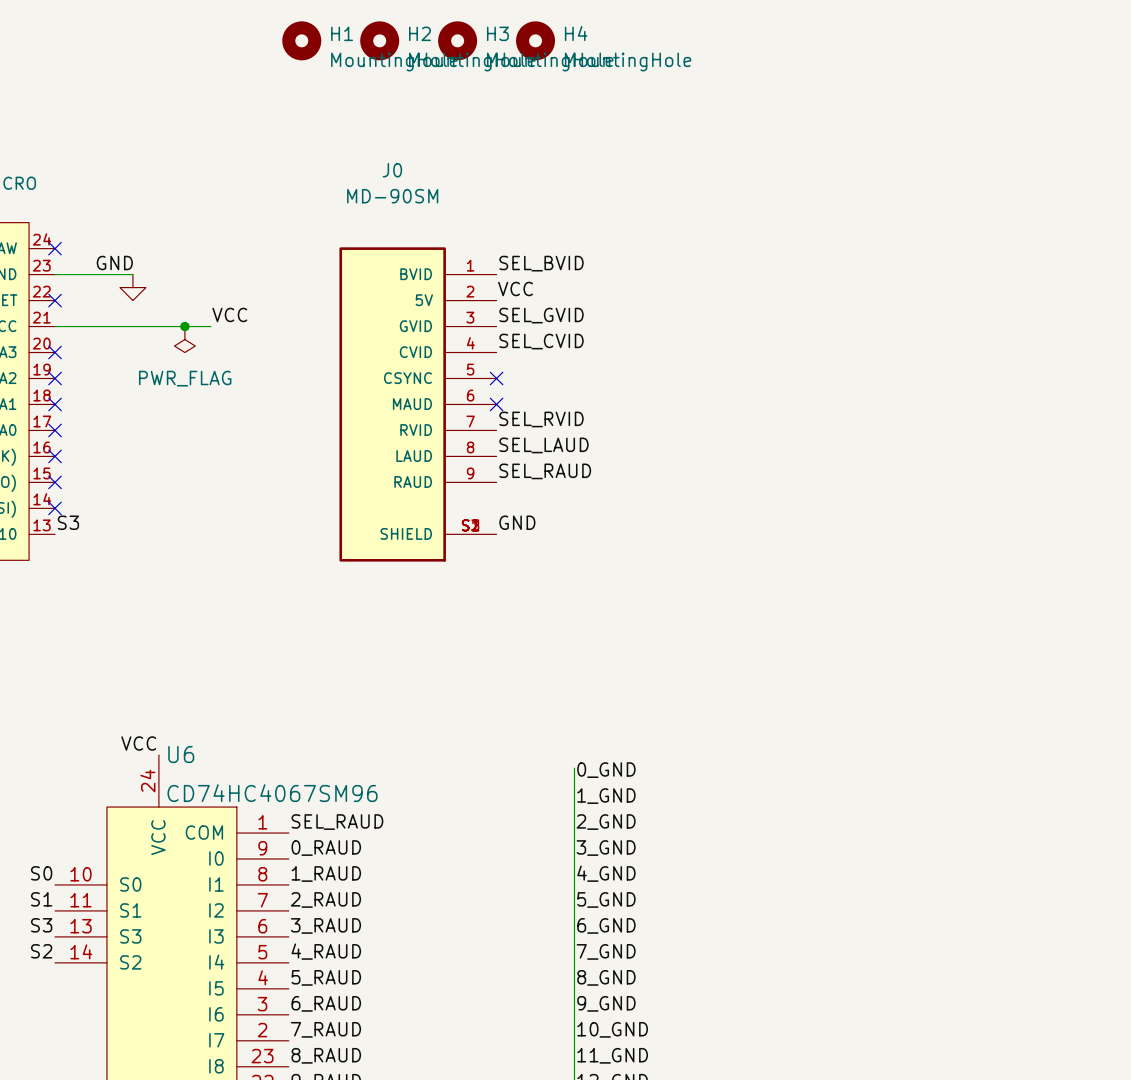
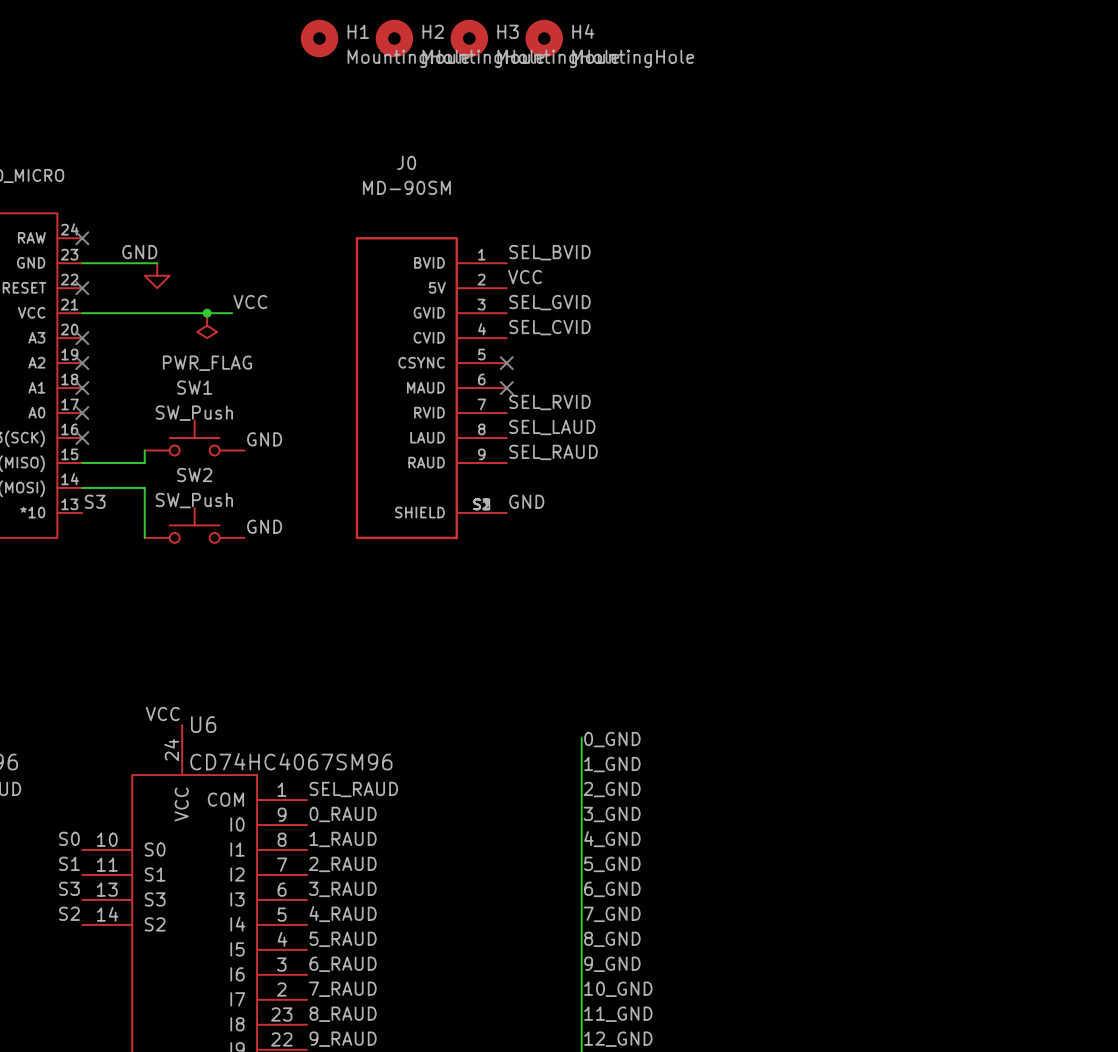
SW1: none -> SW_Push (194, 438)
label: none -> GND (264, 439)
wire: none -> (144, 450) (144, 462) (82, 462)
no-connect mark: (55, 482) -> none
wire: none -> (82, 487) (144, 487) (144, 537)
no-connect mark: (55, 508) -> none
SW2: none -> SW_Push (194, 525)
label: none -> GND (264, 526)

